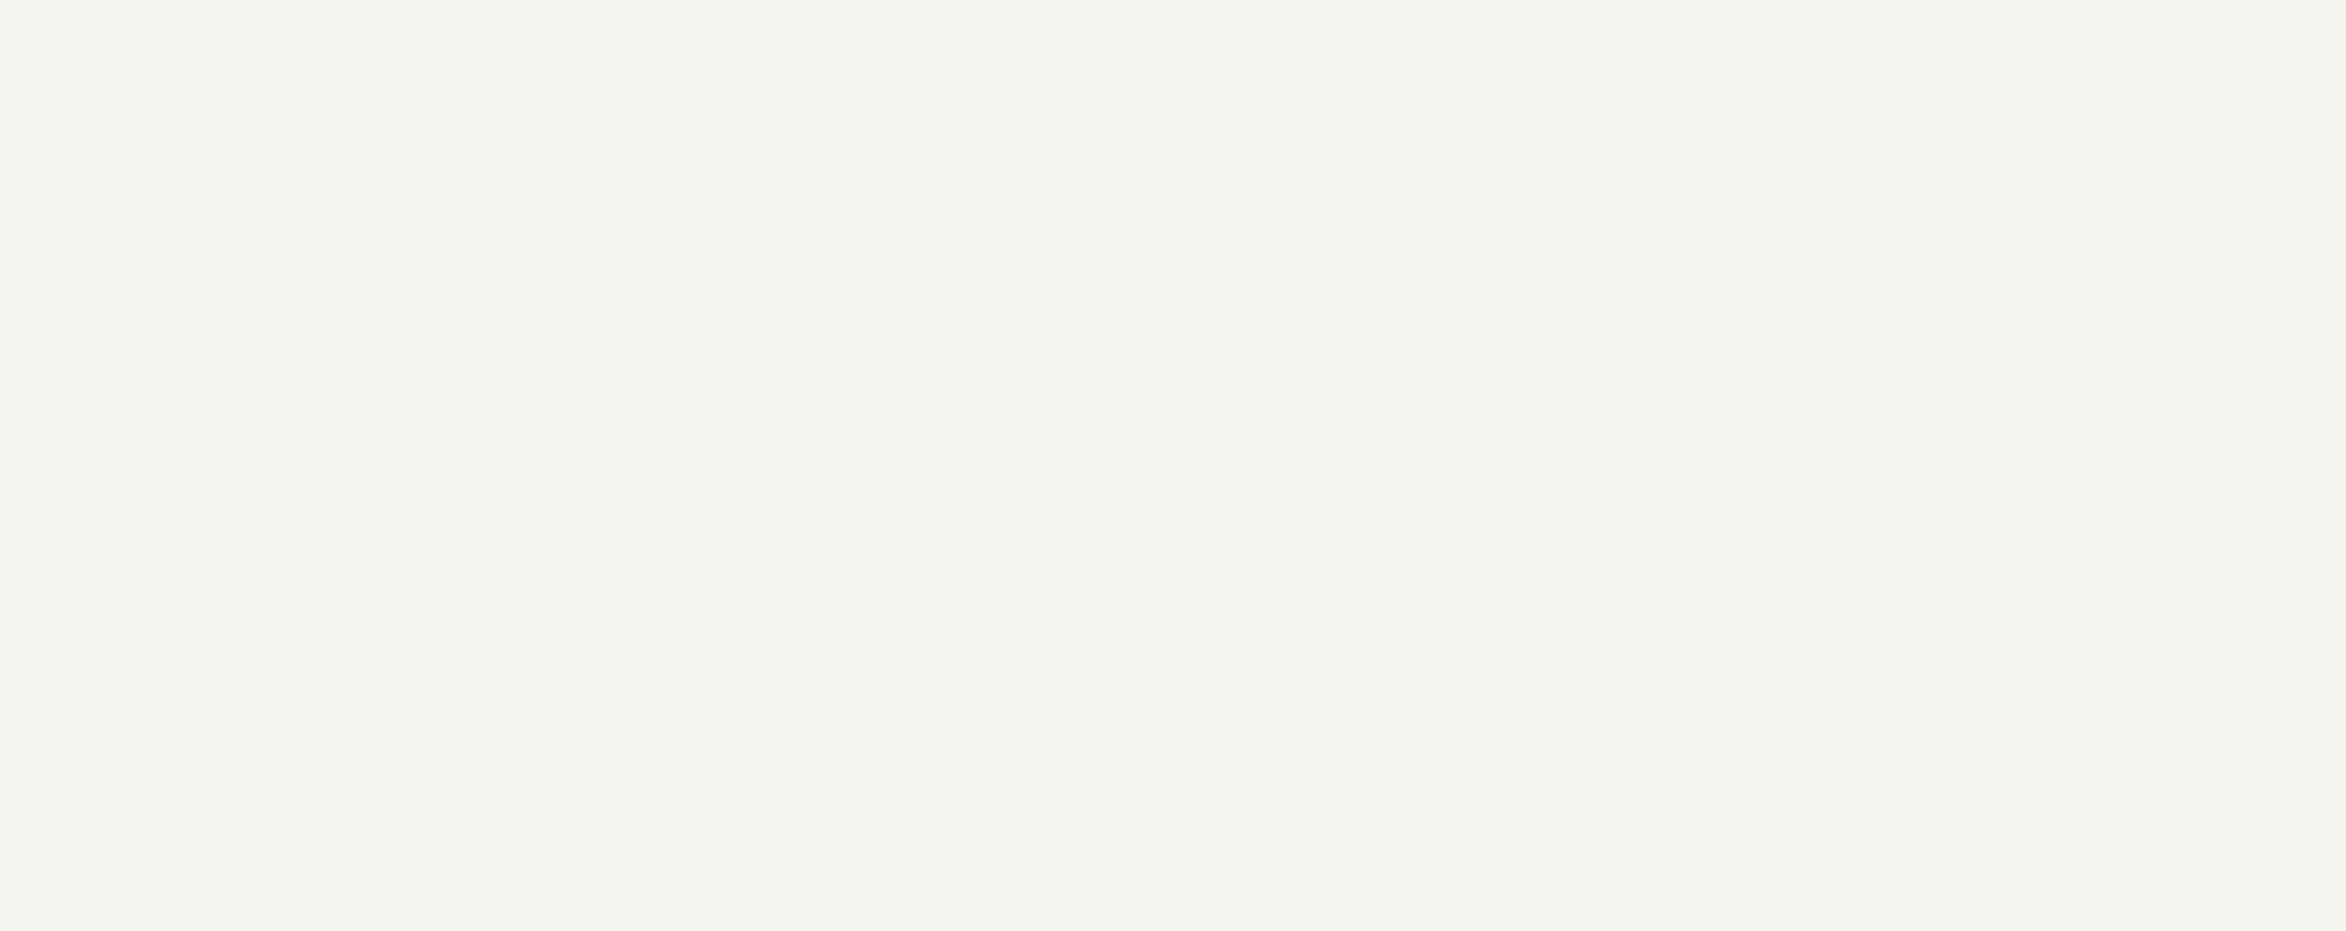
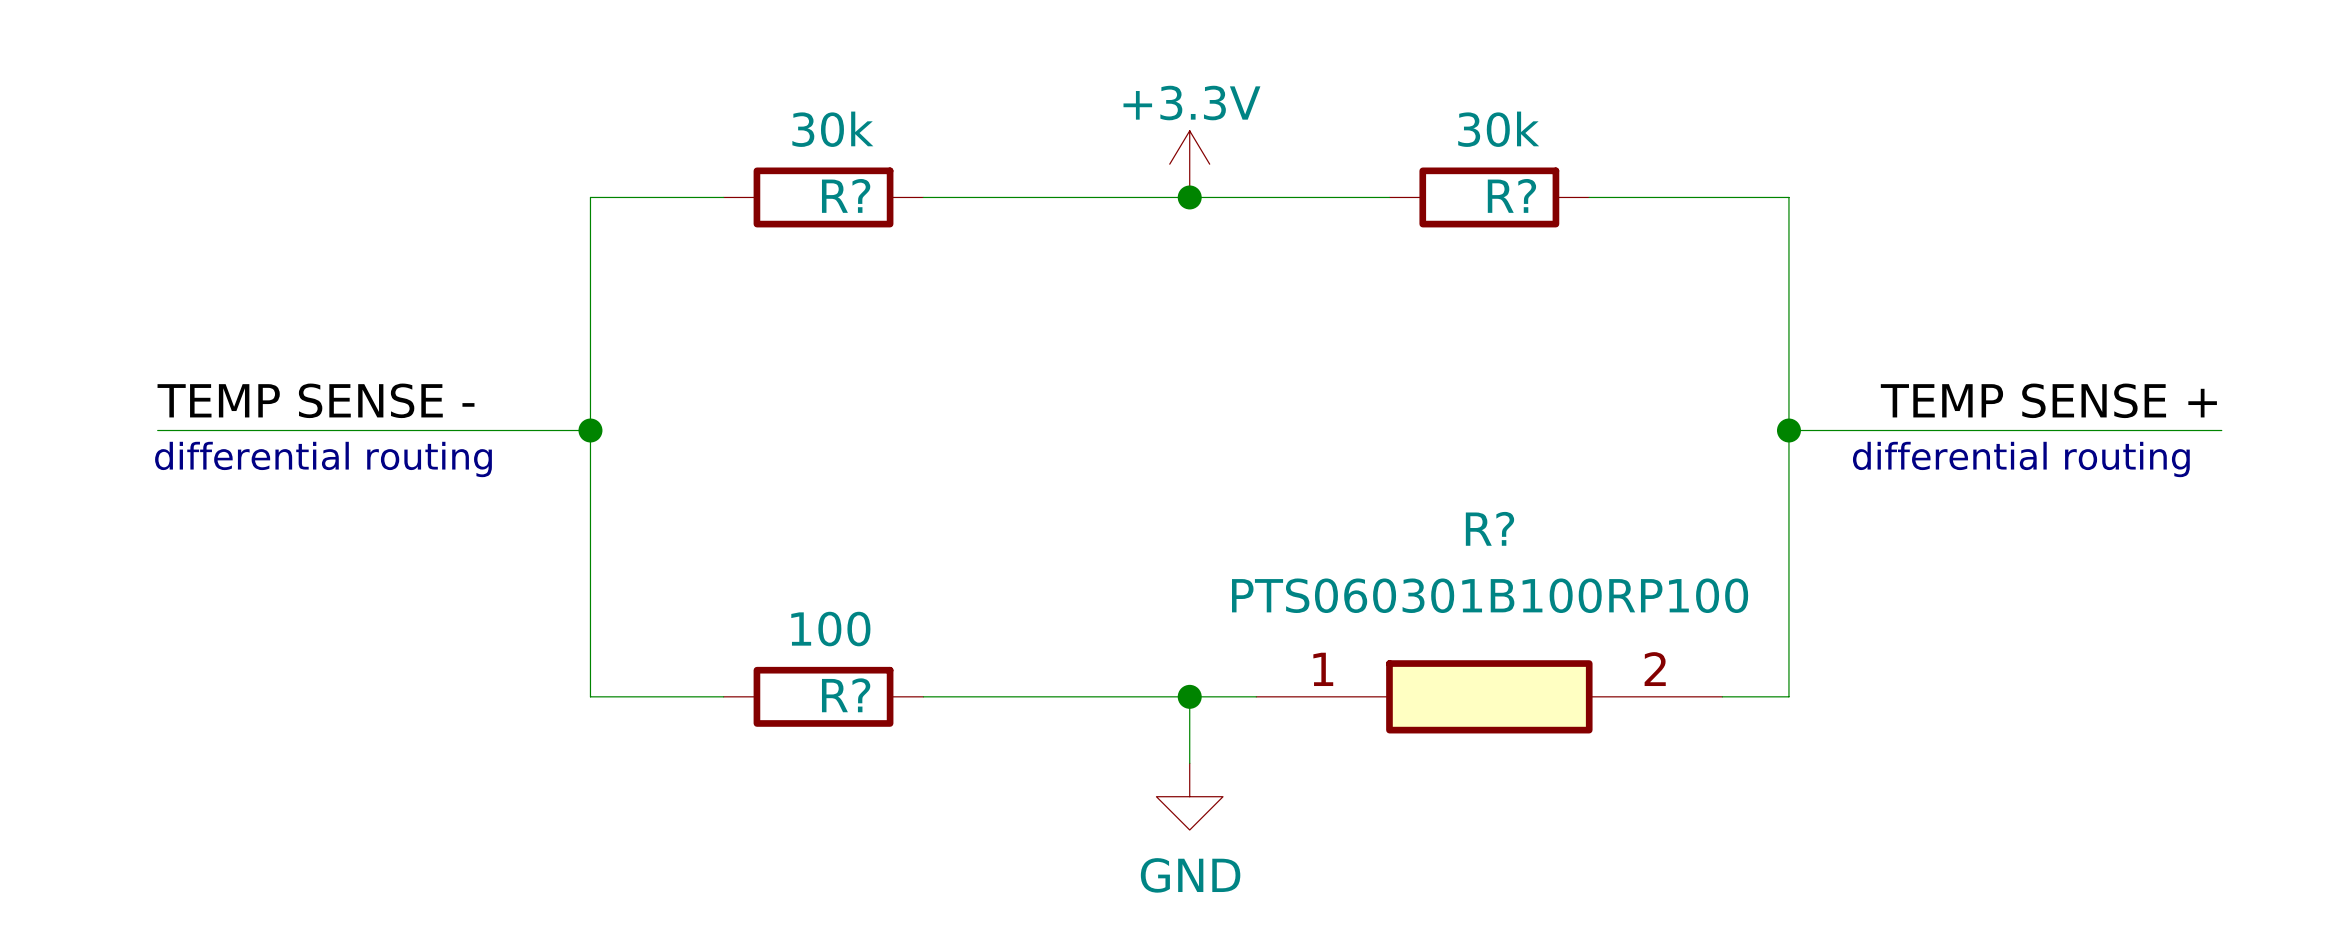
power symbol: none -> +3.3V (1189, 164)
wire: none -> (723, 197) (590, 197) (590, 696) (723, 696)
R?: none -> 30k (823, 197)
wire: none -> (923, 197) (1389, 197)
junction: none -> (1189, 197)
R?: none -> 30k (1489, 197)
wire: none -> (1589, 197) (1788, 197) (1788, 696) (1722, 696)
label: none -> TEMP SENSE - (316, 400)
label: none -> TEMP SENSE + (2048, 400)
wire: none -> (157, 430) (590, 430)
junction: none -> (590, 430)
wire: none -> (1788, 430) (2221, 430)
junction: none -> (1788, 430)
text: none -> differential routing (323, 459)
text: none -> differential routing (2021, 459)
R?: none -> 100 (823, 696)
wire: none -> (923, 696) (1256, 696)
wire: none -> (1189, 696) (1189, 763)
junction: none -> (1189, 696)
R?: none -> PTS060301B100RP100 (1489, 696)
power symbol: none -> GND (1189, 796)

